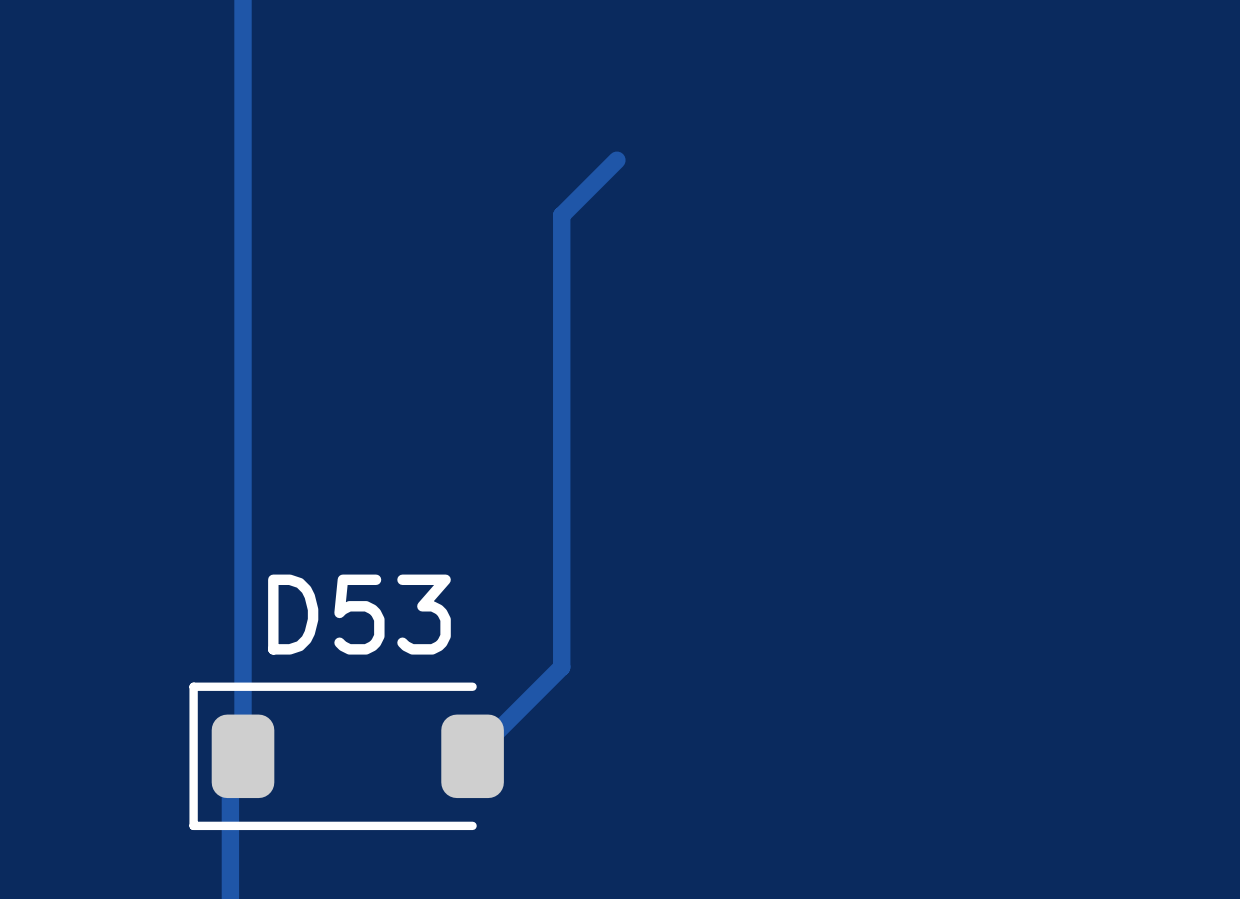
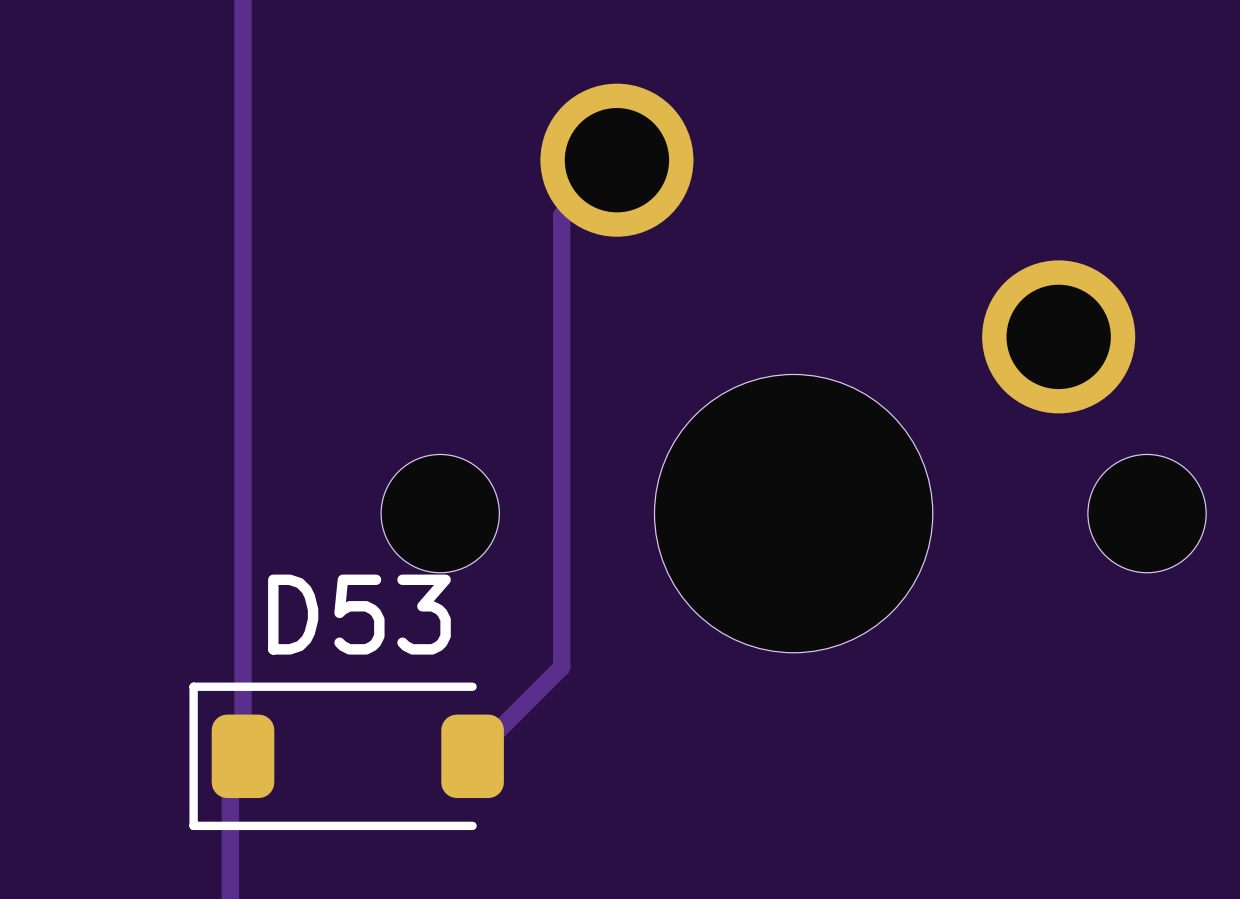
part: none -> (793, 368)

